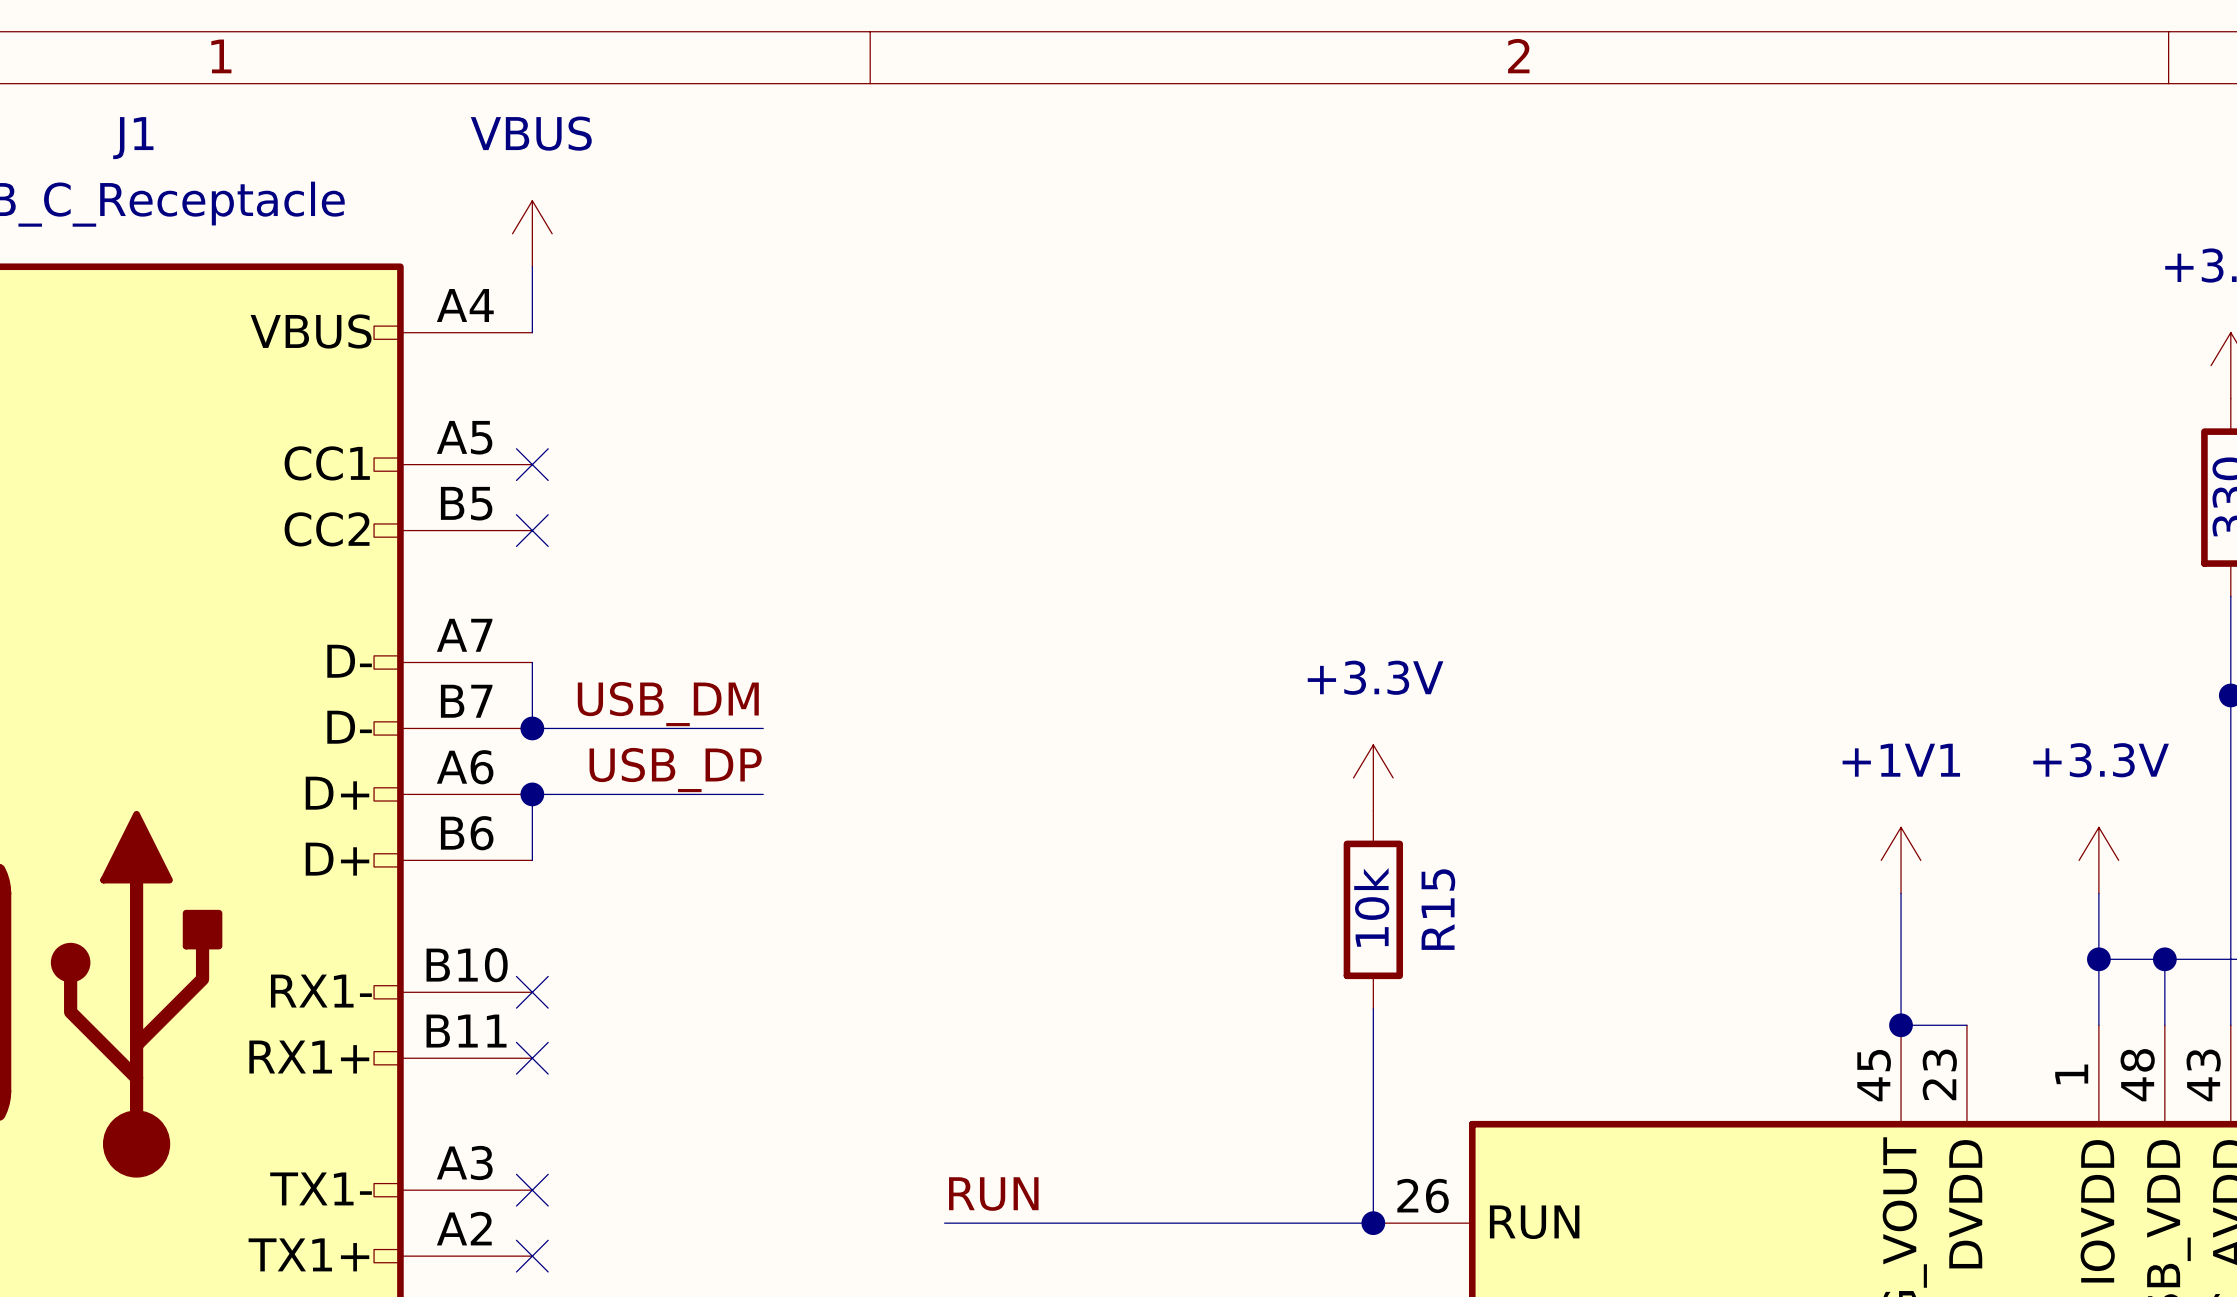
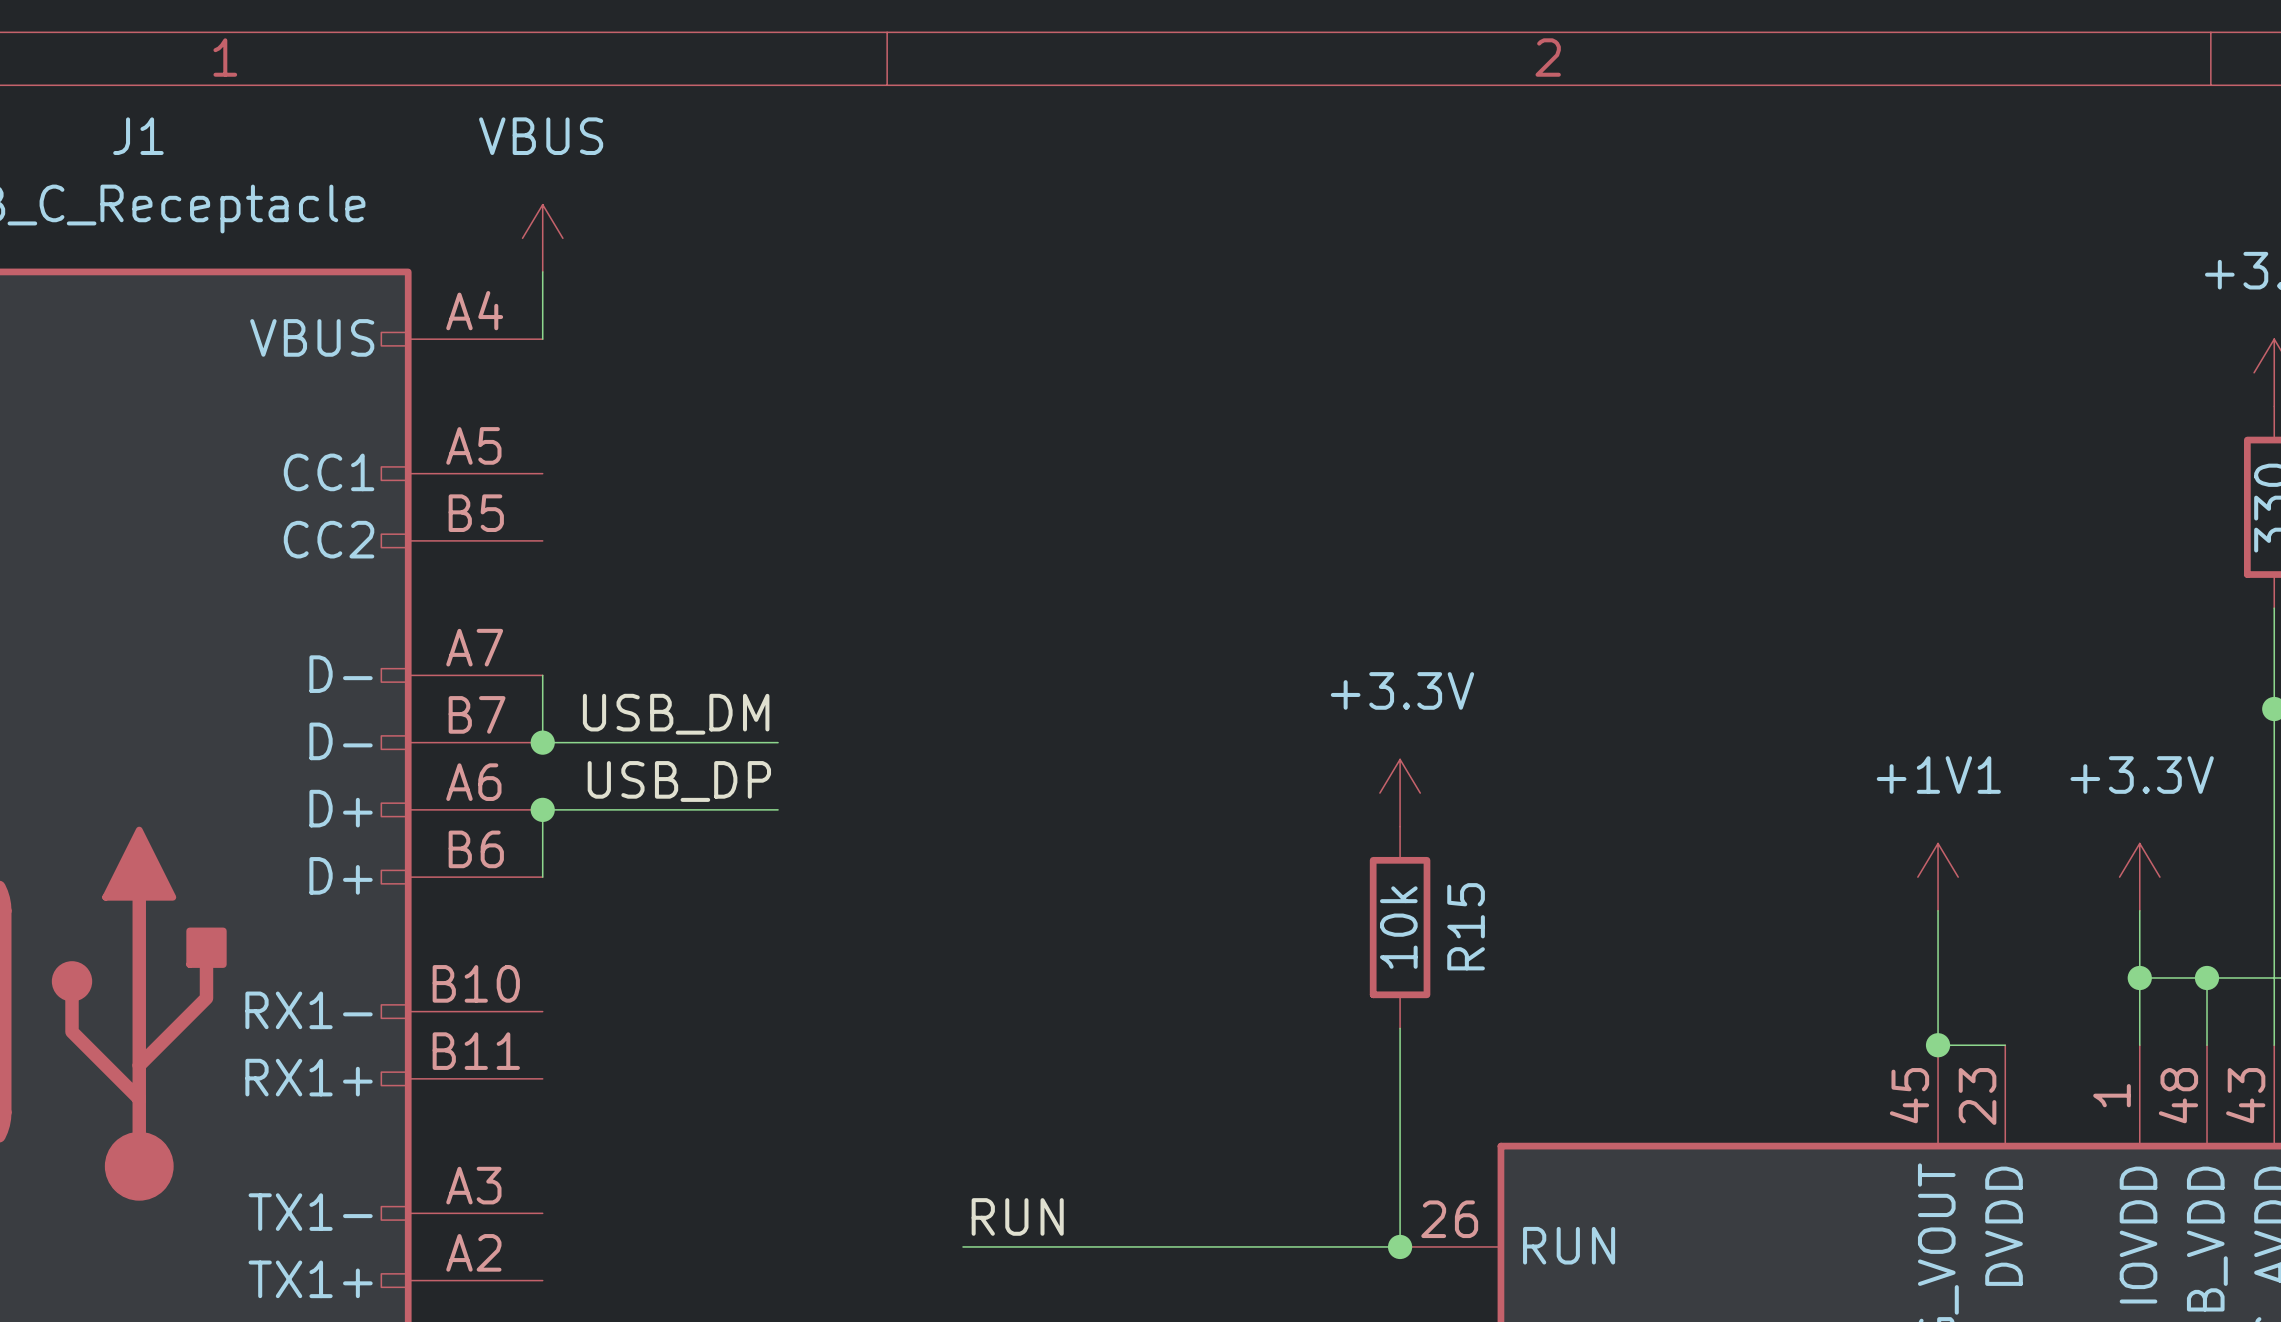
no-connect mark: (532, 464) -> none
no-connect mark: (532, 530) -> none
no-connect mark: (532, 992) -> none
no-connect mark: (532, 1058) -> none
no-connect mark: (532, 1190) -> none
no-connect mark: (532, 1256) -> none

